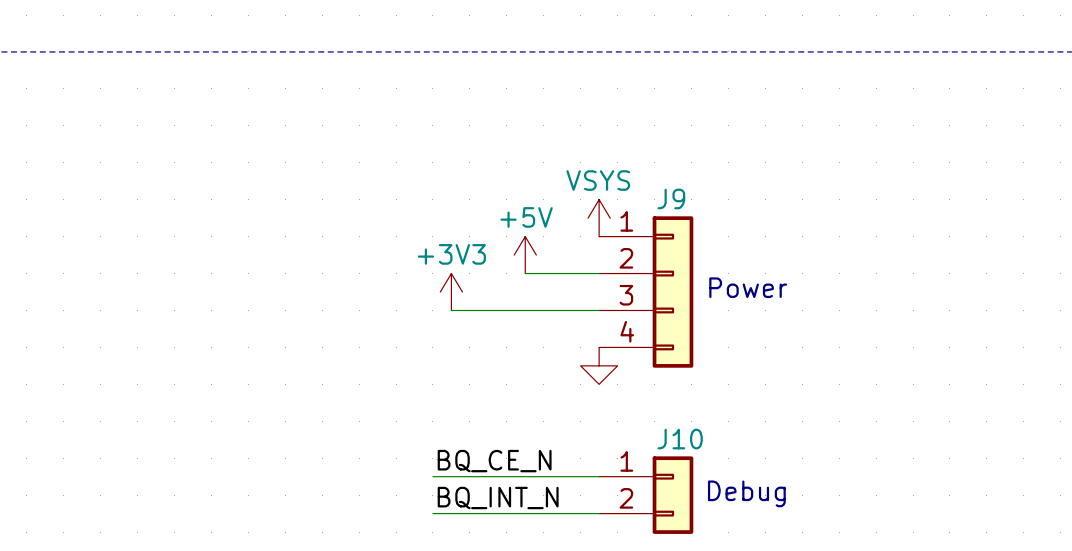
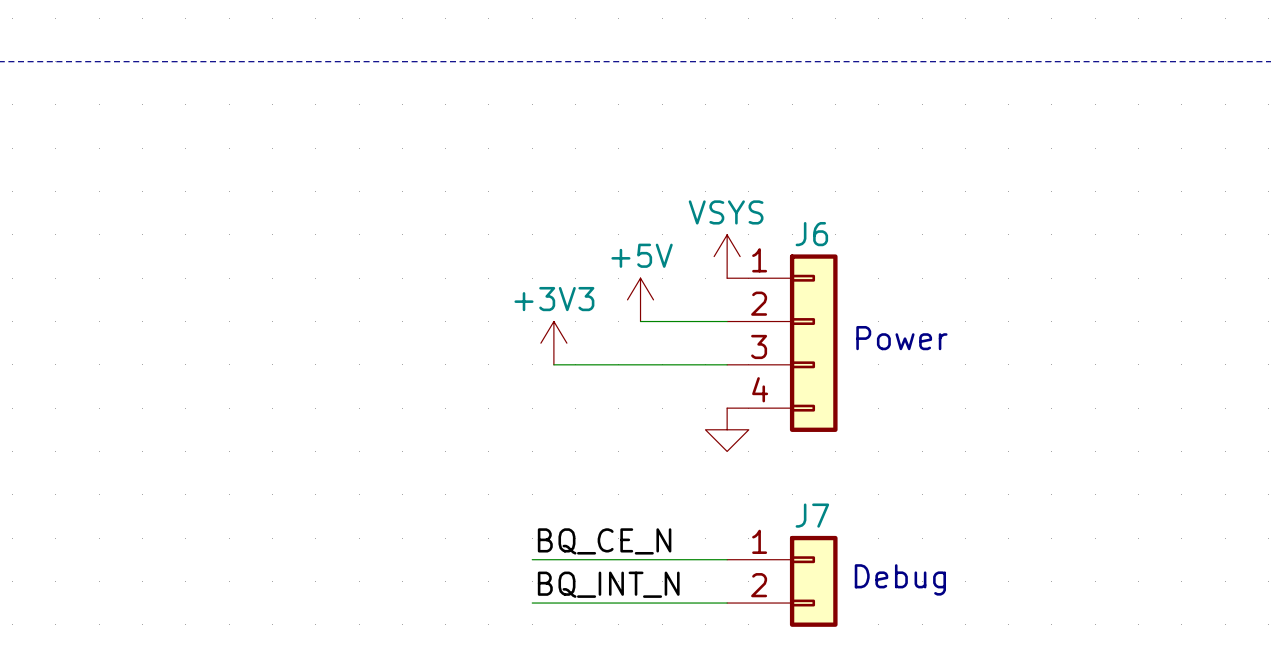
J9 name: J9 (671, 198) -> J6 (811, 234)
J10 name: J10 (680, 439) -> J7 (812, 515)

